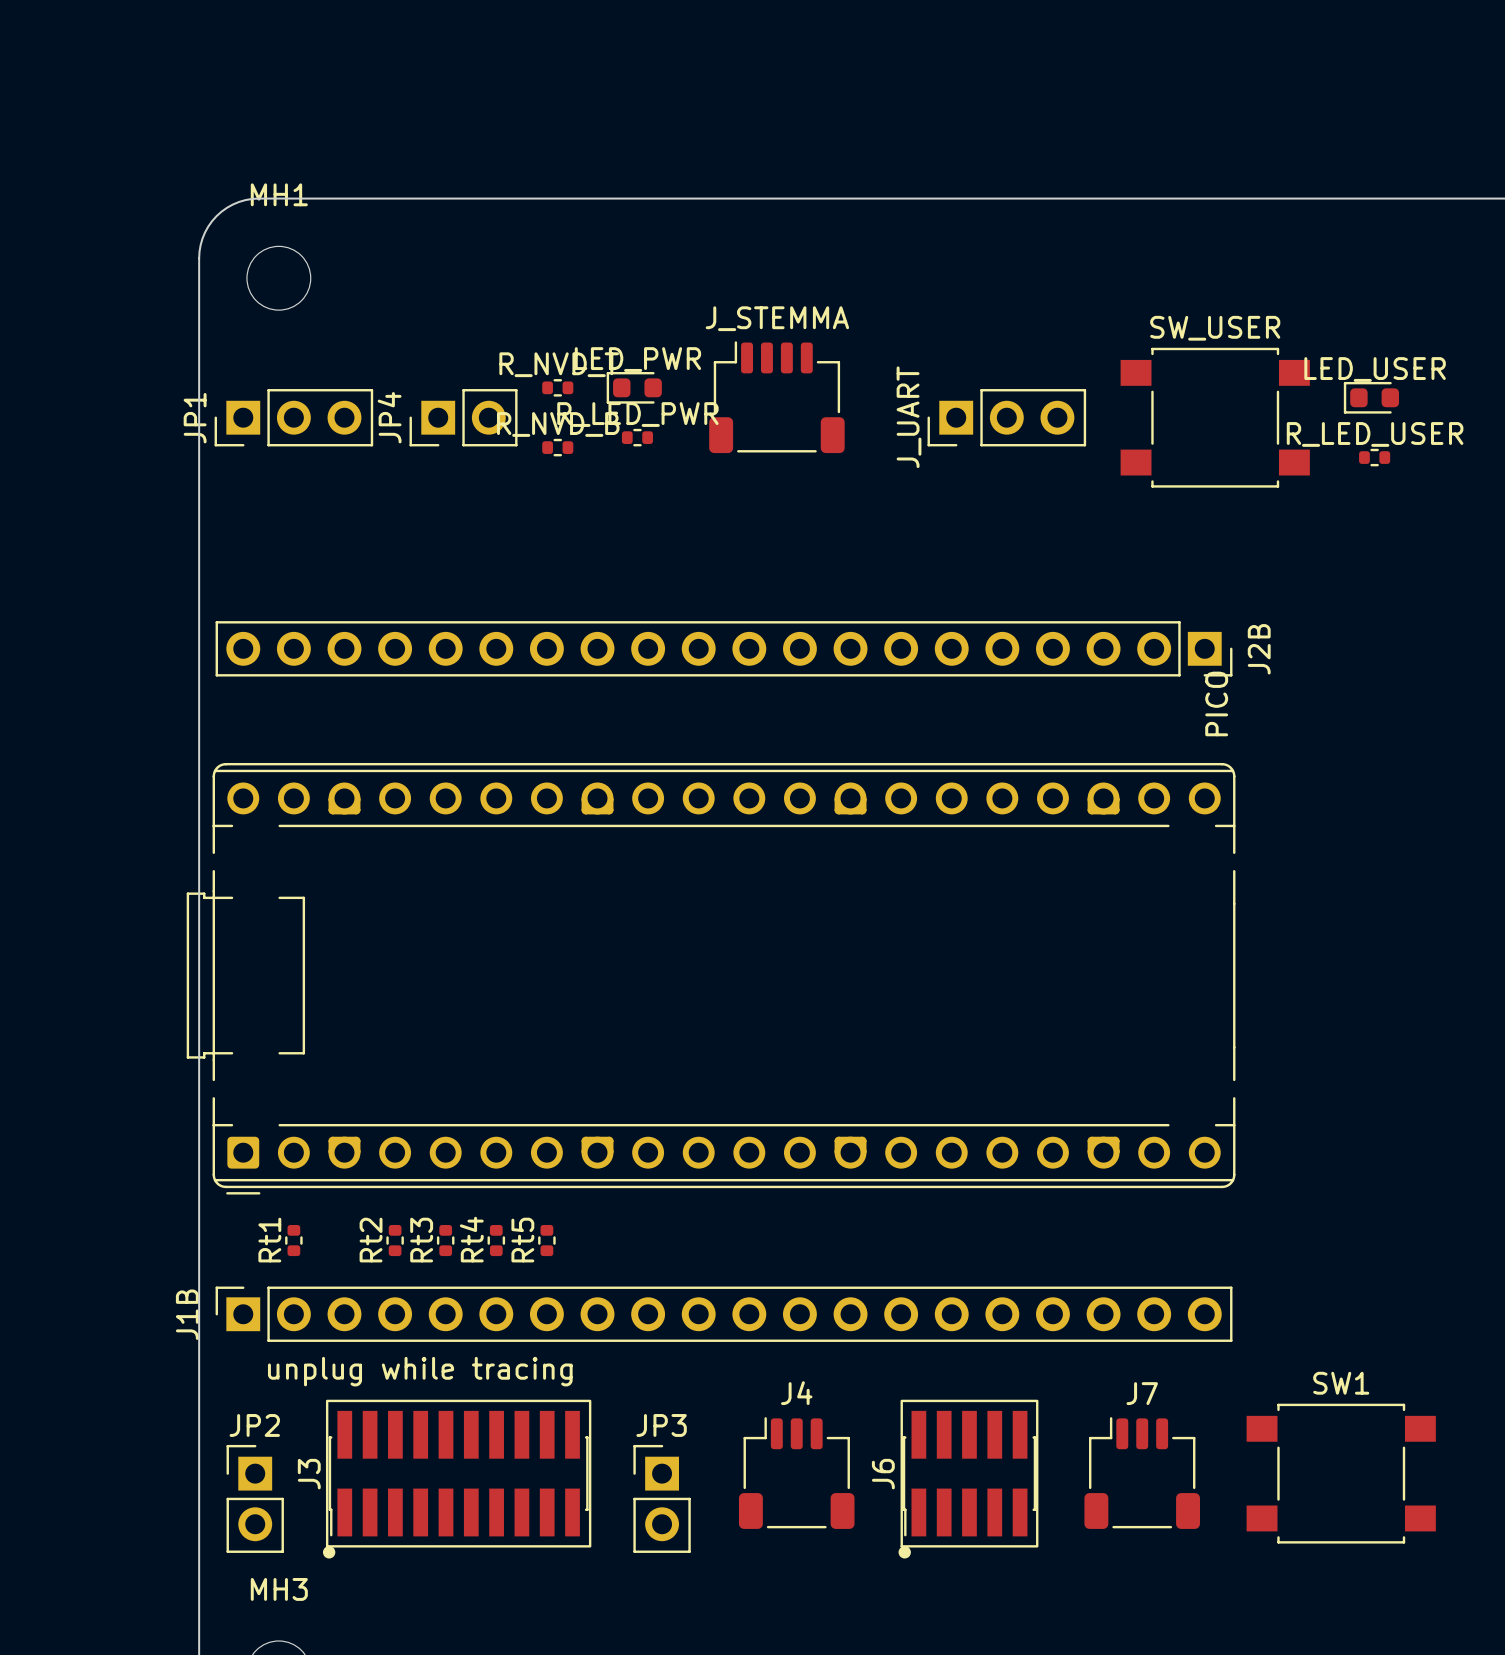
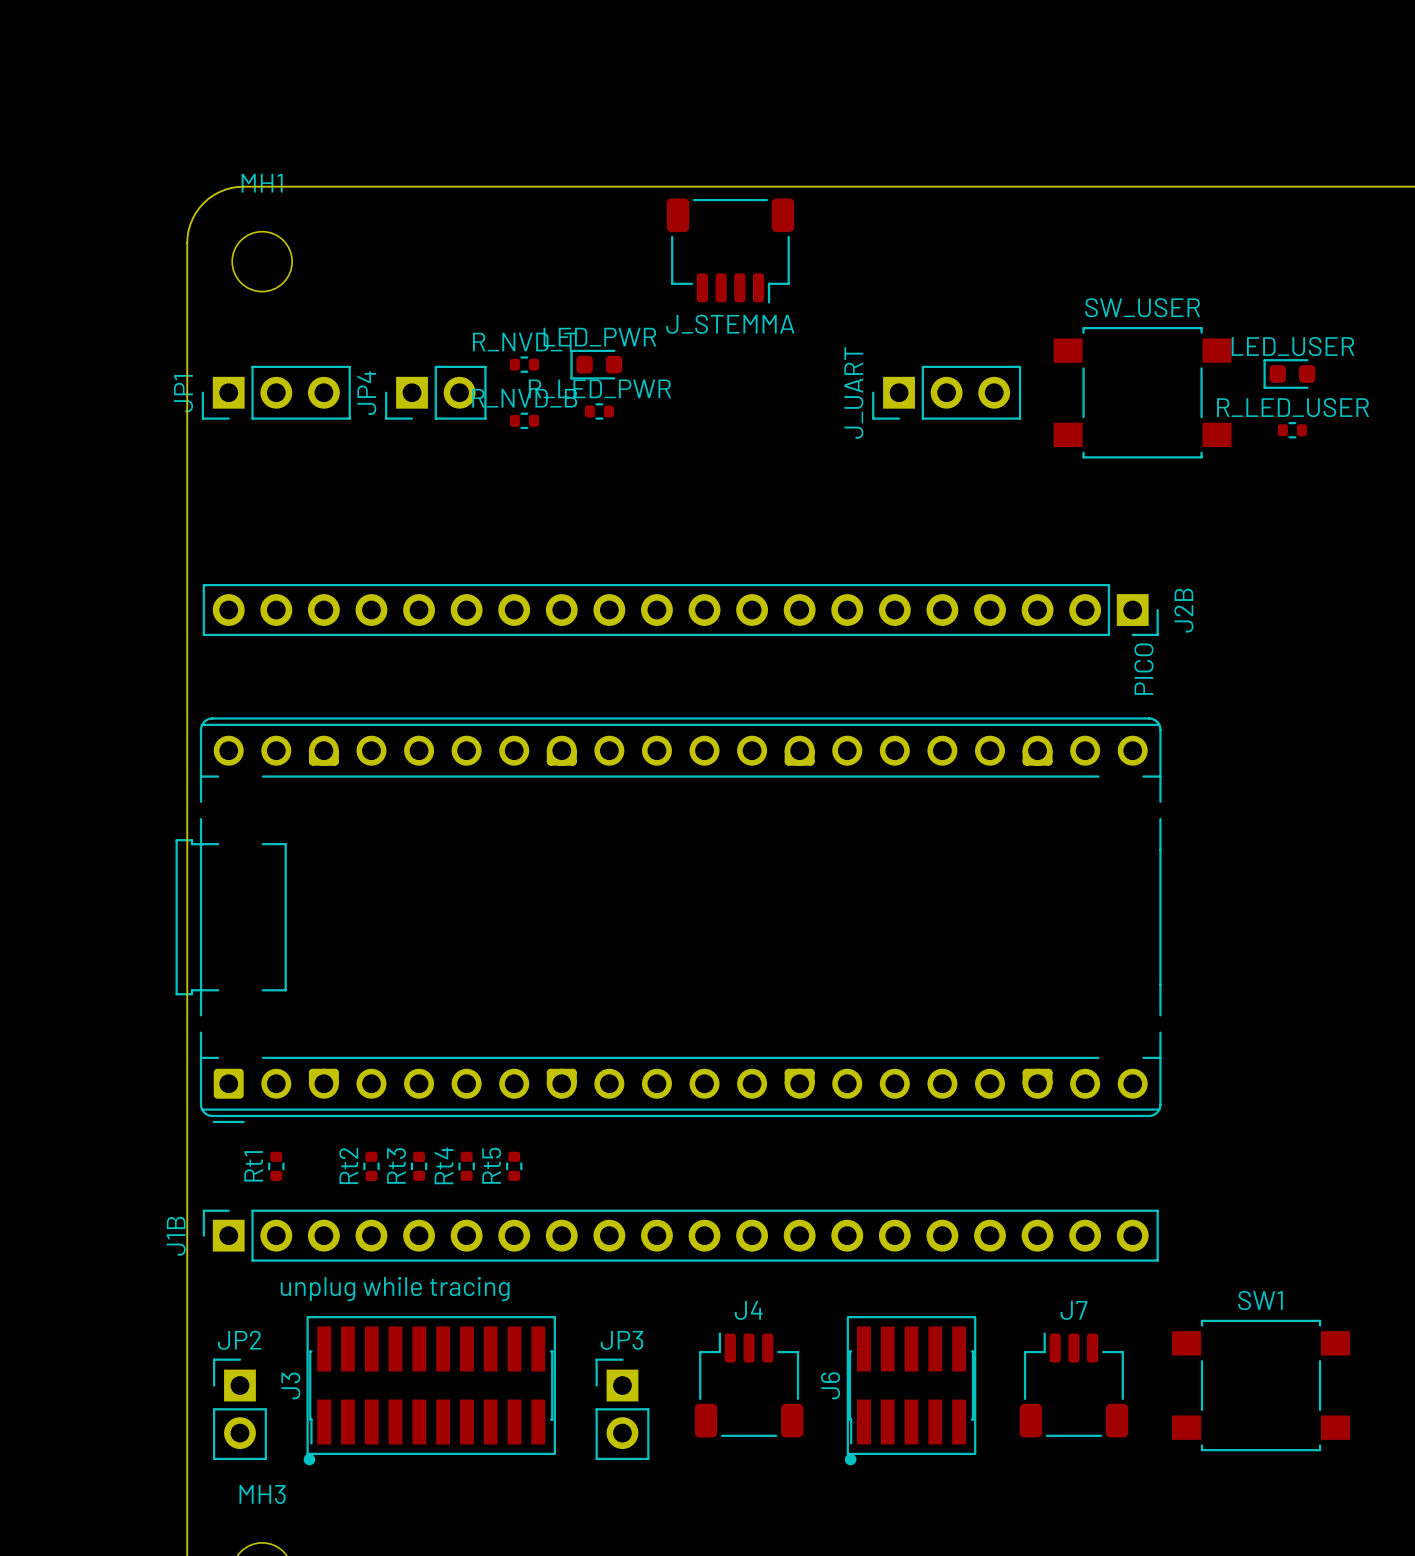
J_STEMMA rotation: 0° (776, 397) -> 180° (730, 250)
J_STEMMA position: (776, 397) -> (730, 250)

